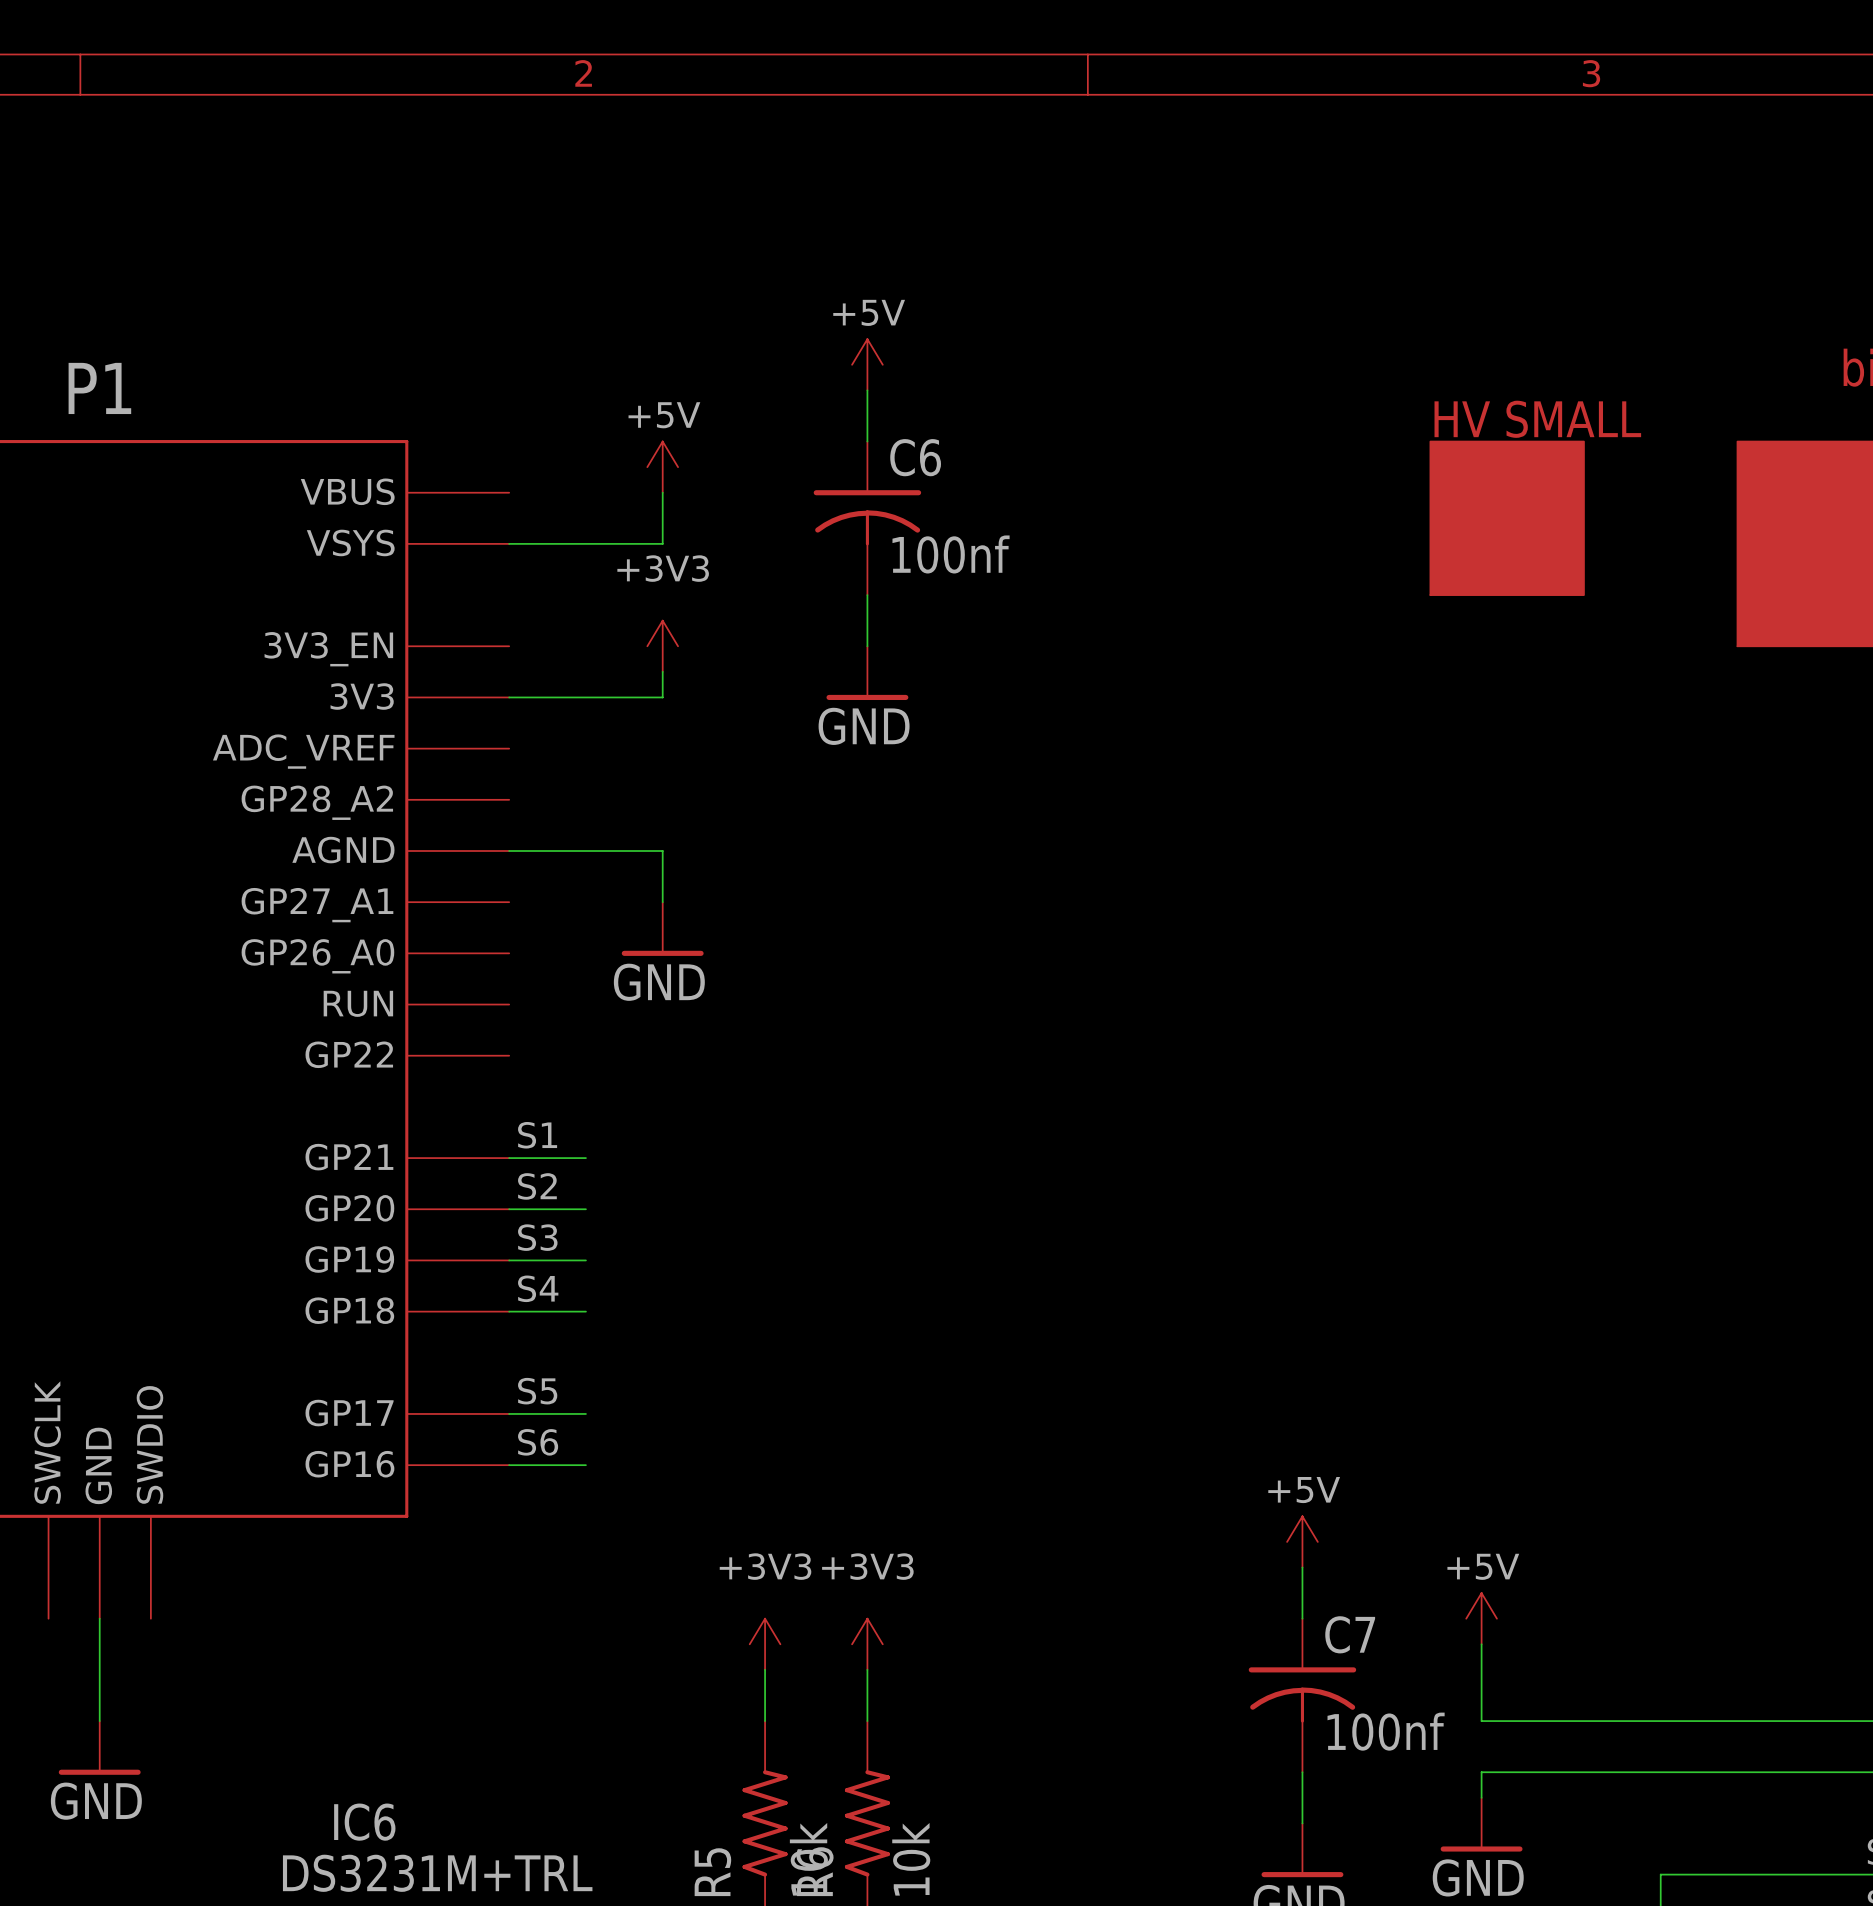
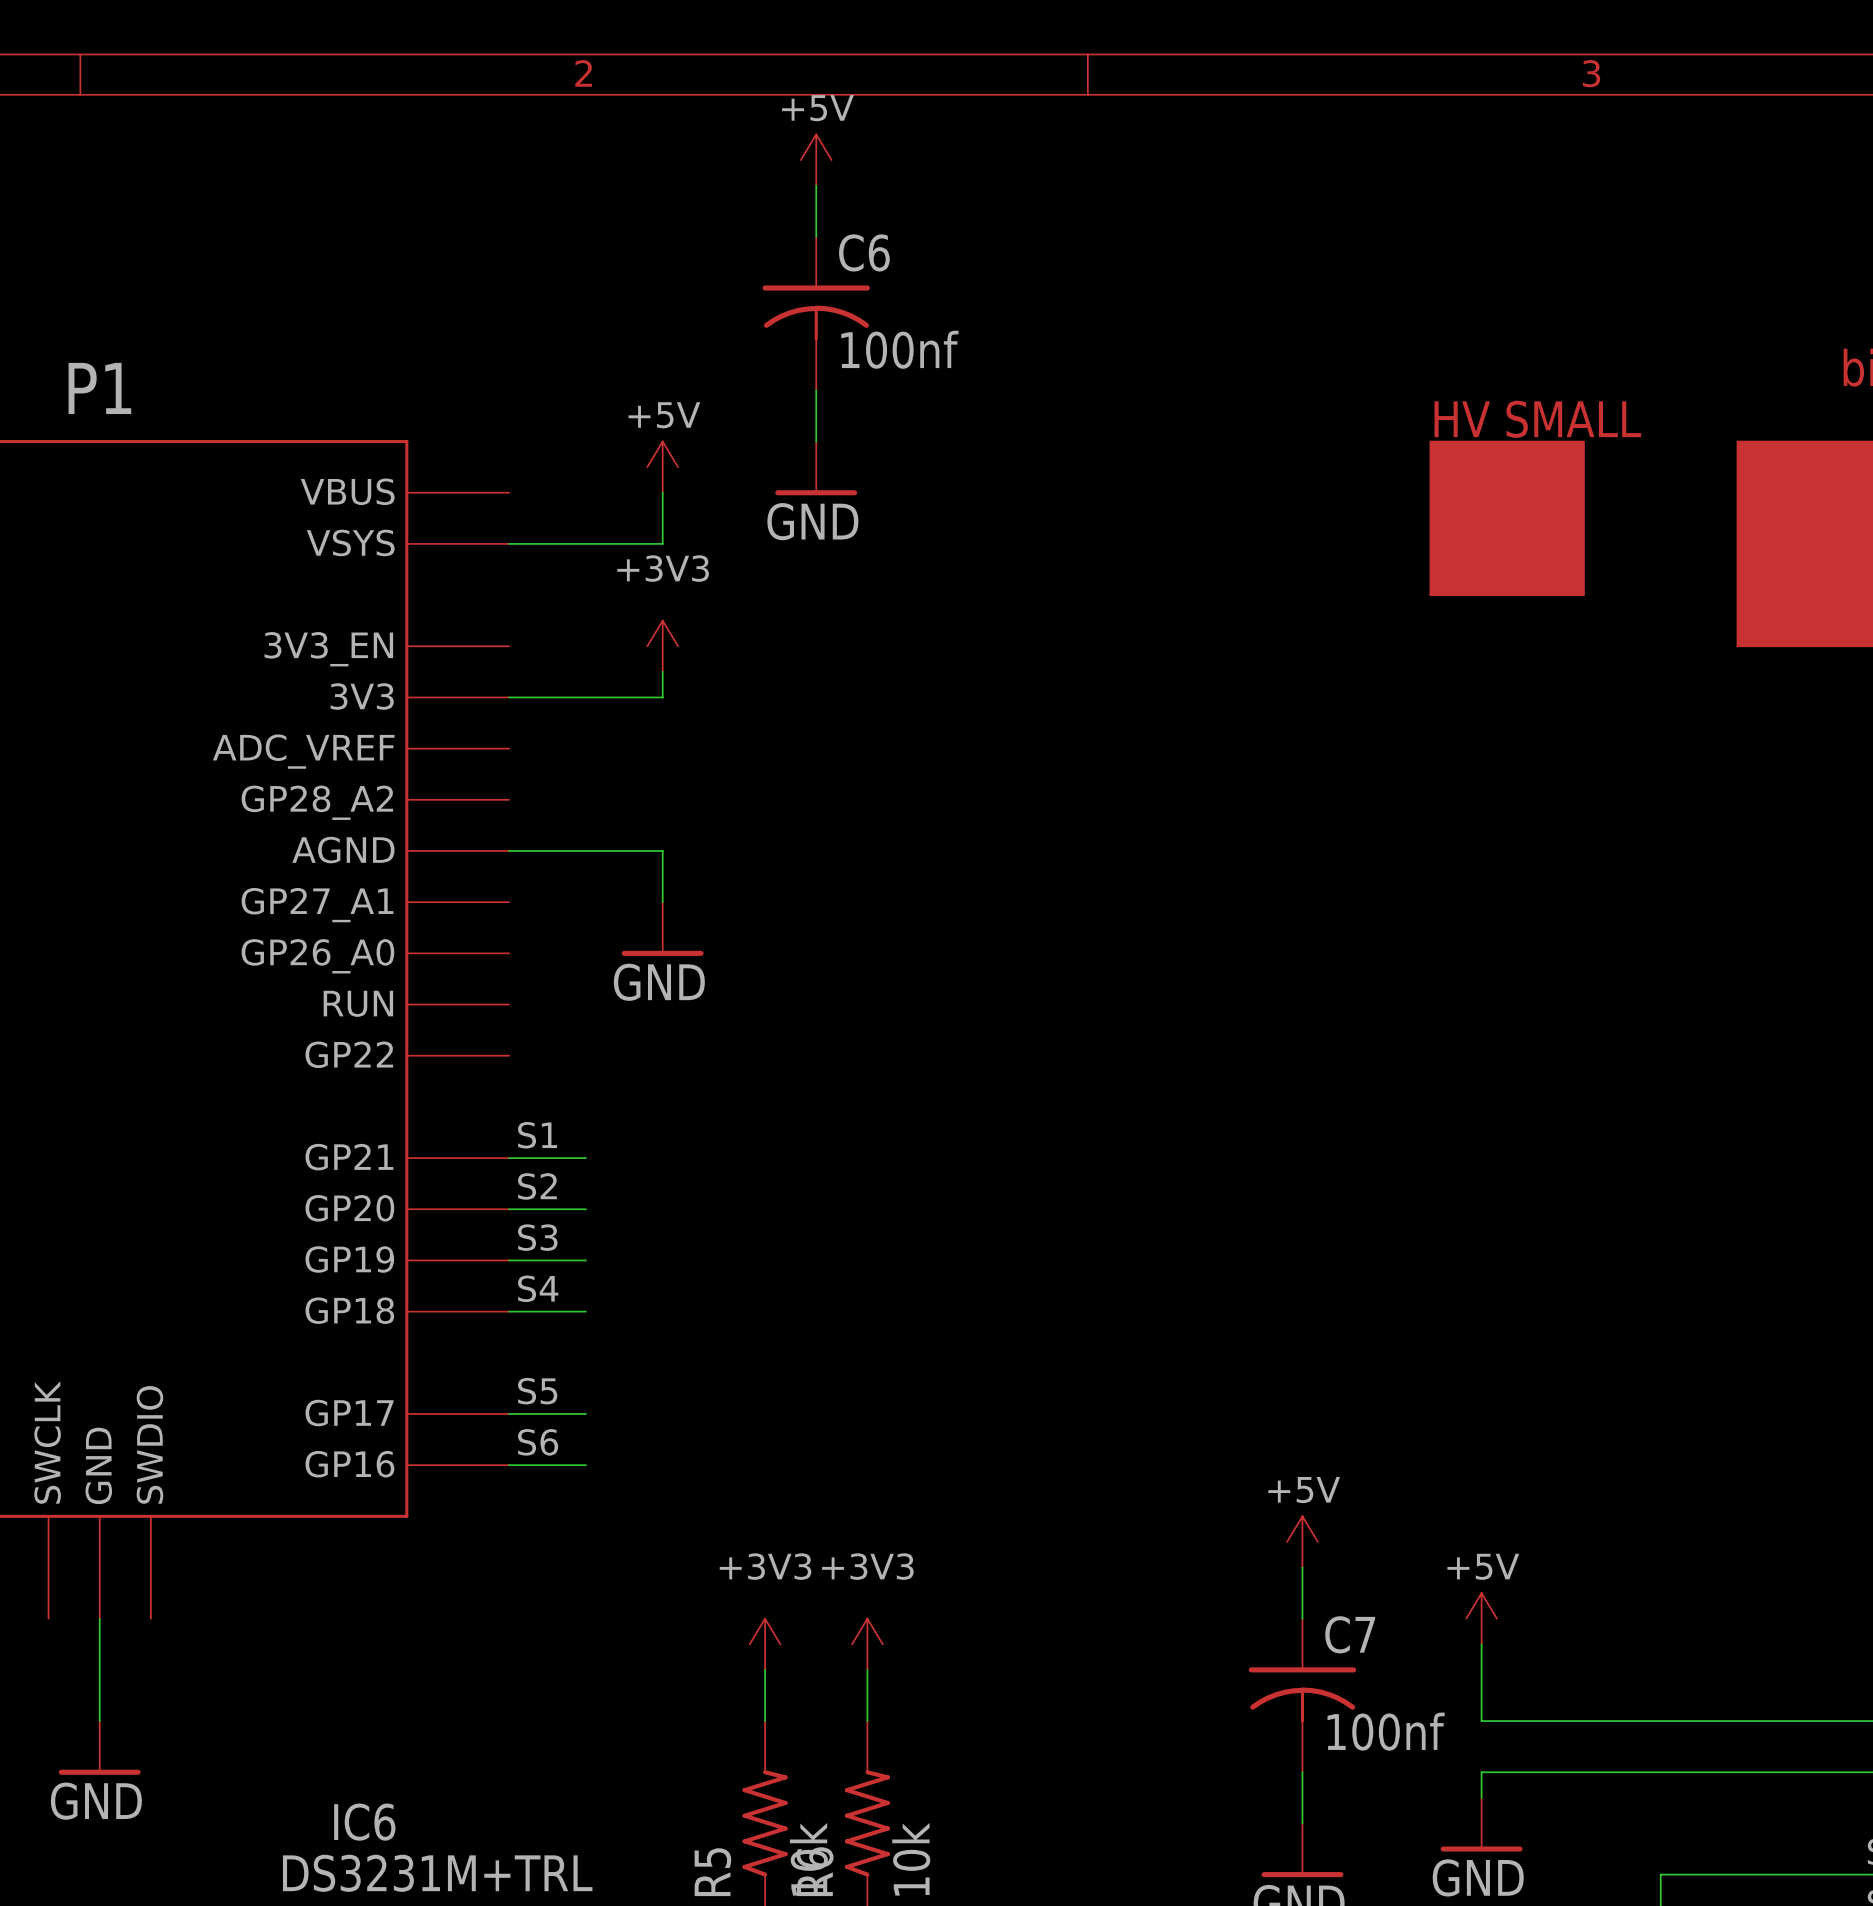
power symbol position: +5V (867, 364) -> +5V (816, 160)
wire: (867, 390) (867, 441) -> (816, 390) (816, 441)
C6 position: (867, 518) -> (816, 313)
wire: (867, 595) (867, 646) -> (816, 185) (816, 236)
power symbol position: GND (867, 673) -> GND (816, 468)

